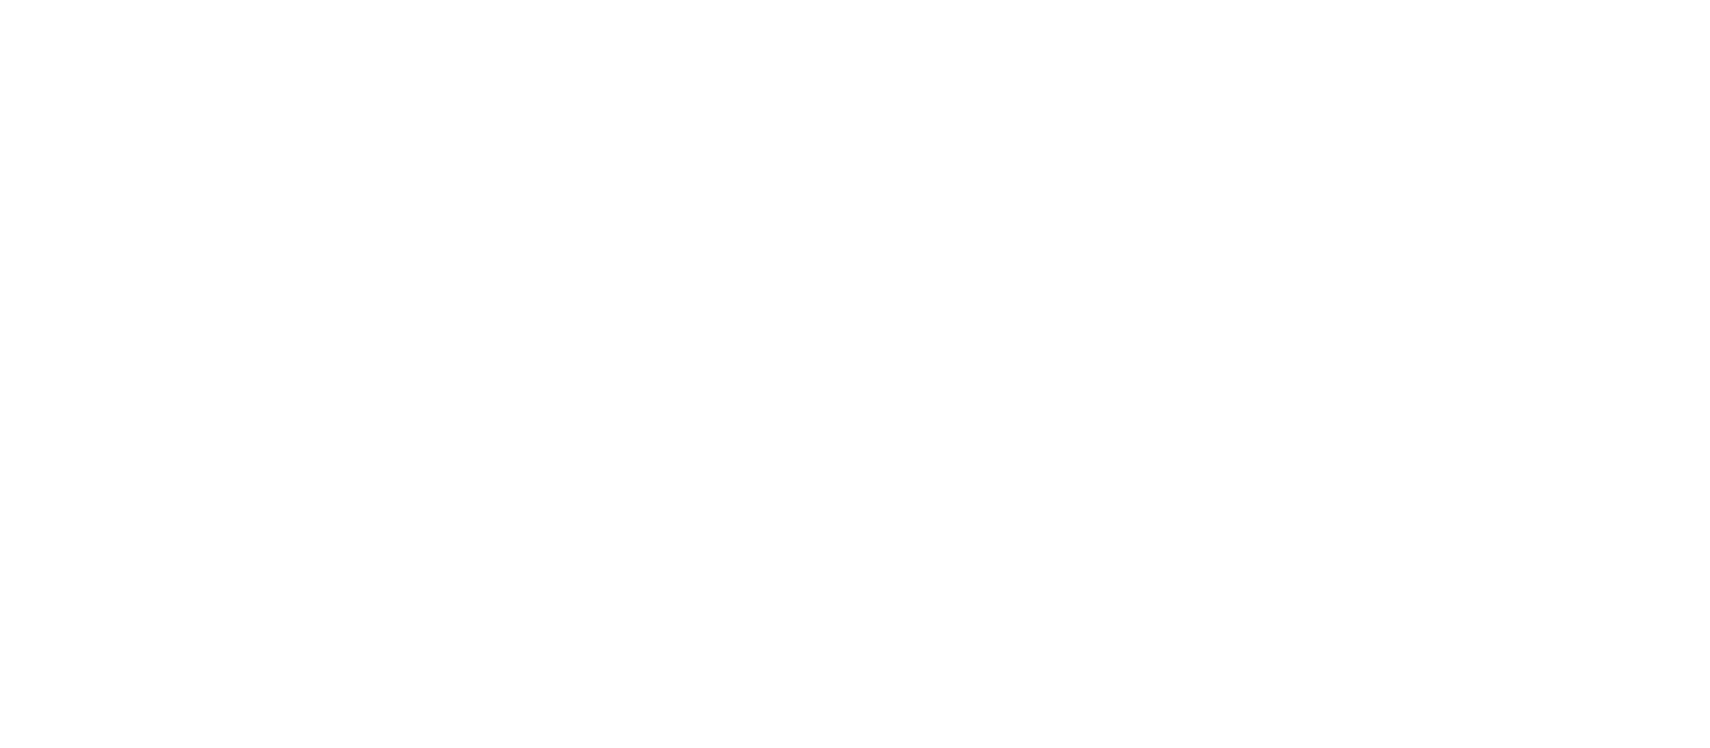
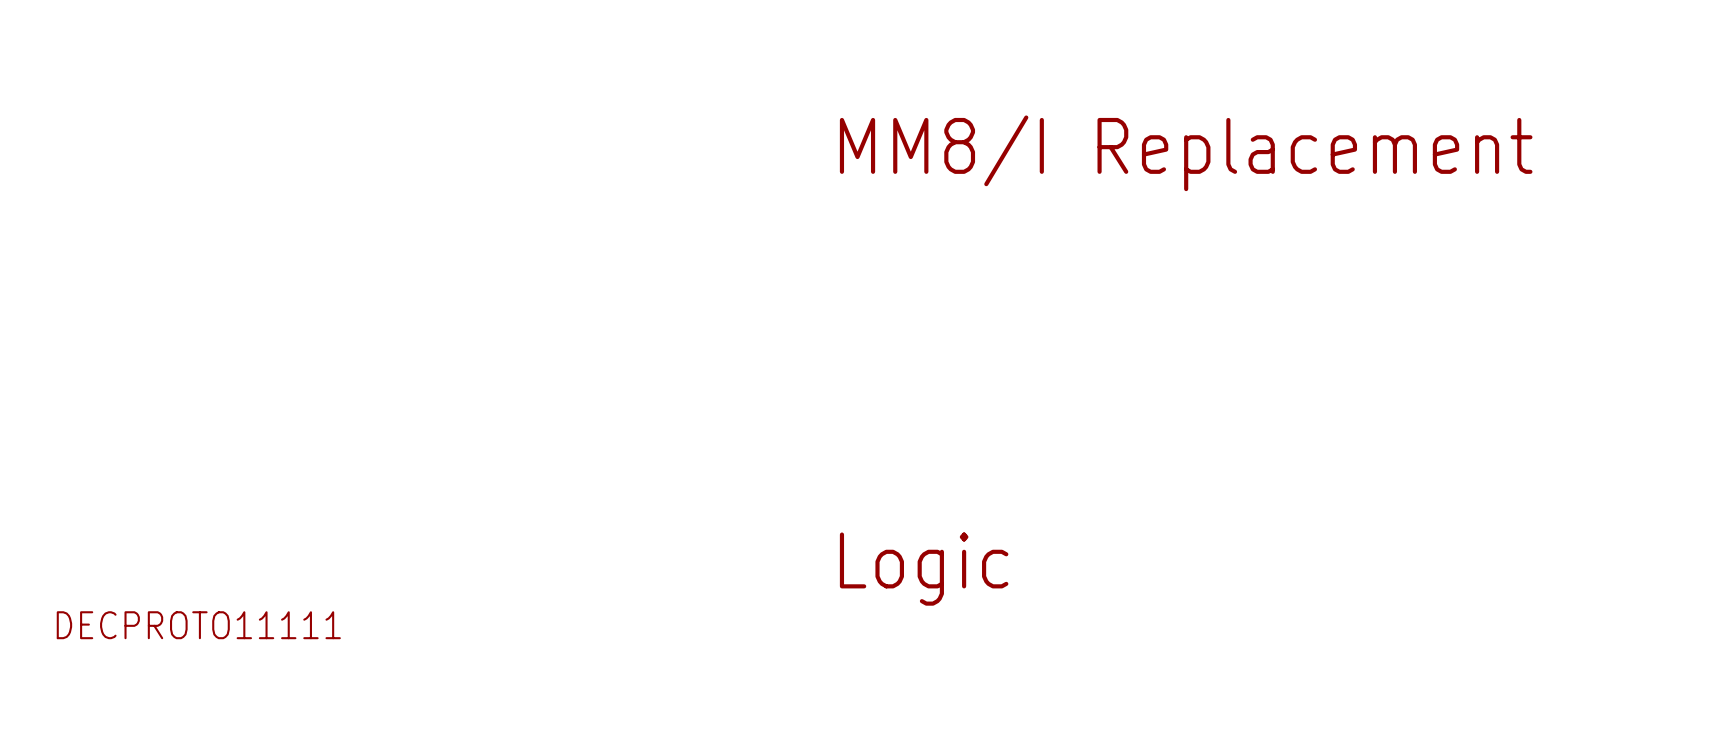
text: none -> MM8/I Replacement (1186, 153)
text: none -> Logic (924, 569)
part: none -> DECPROTO11111 (198, 625)

